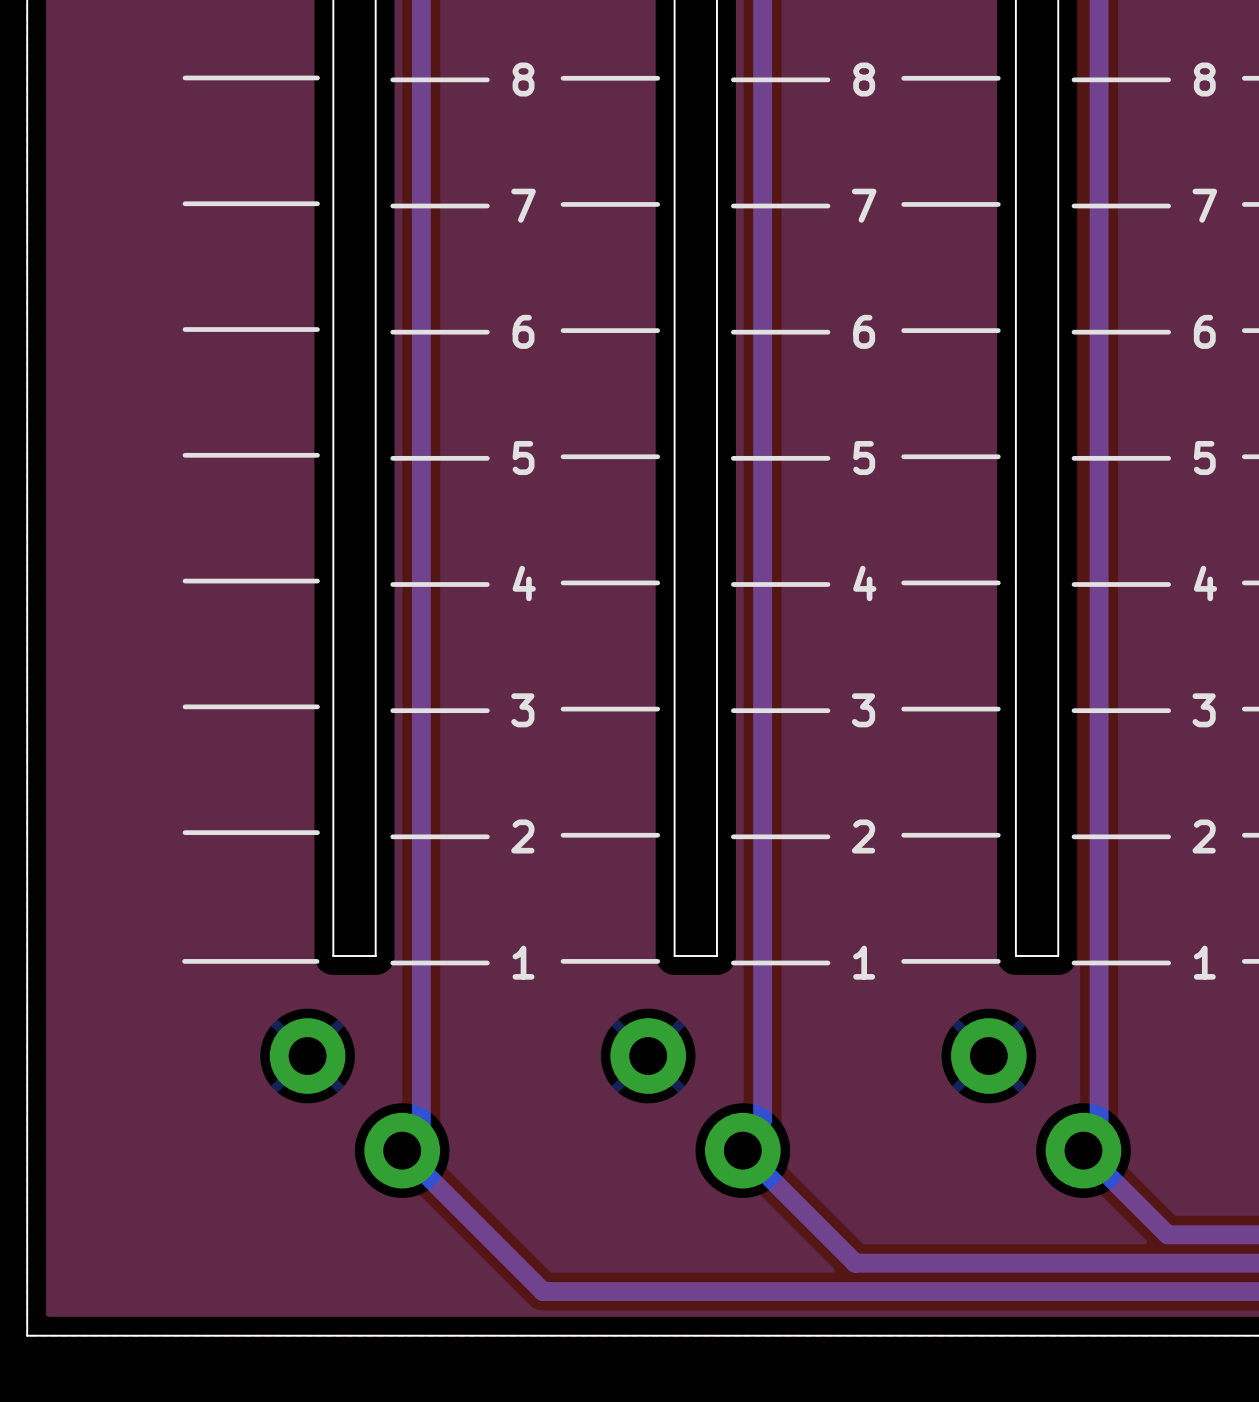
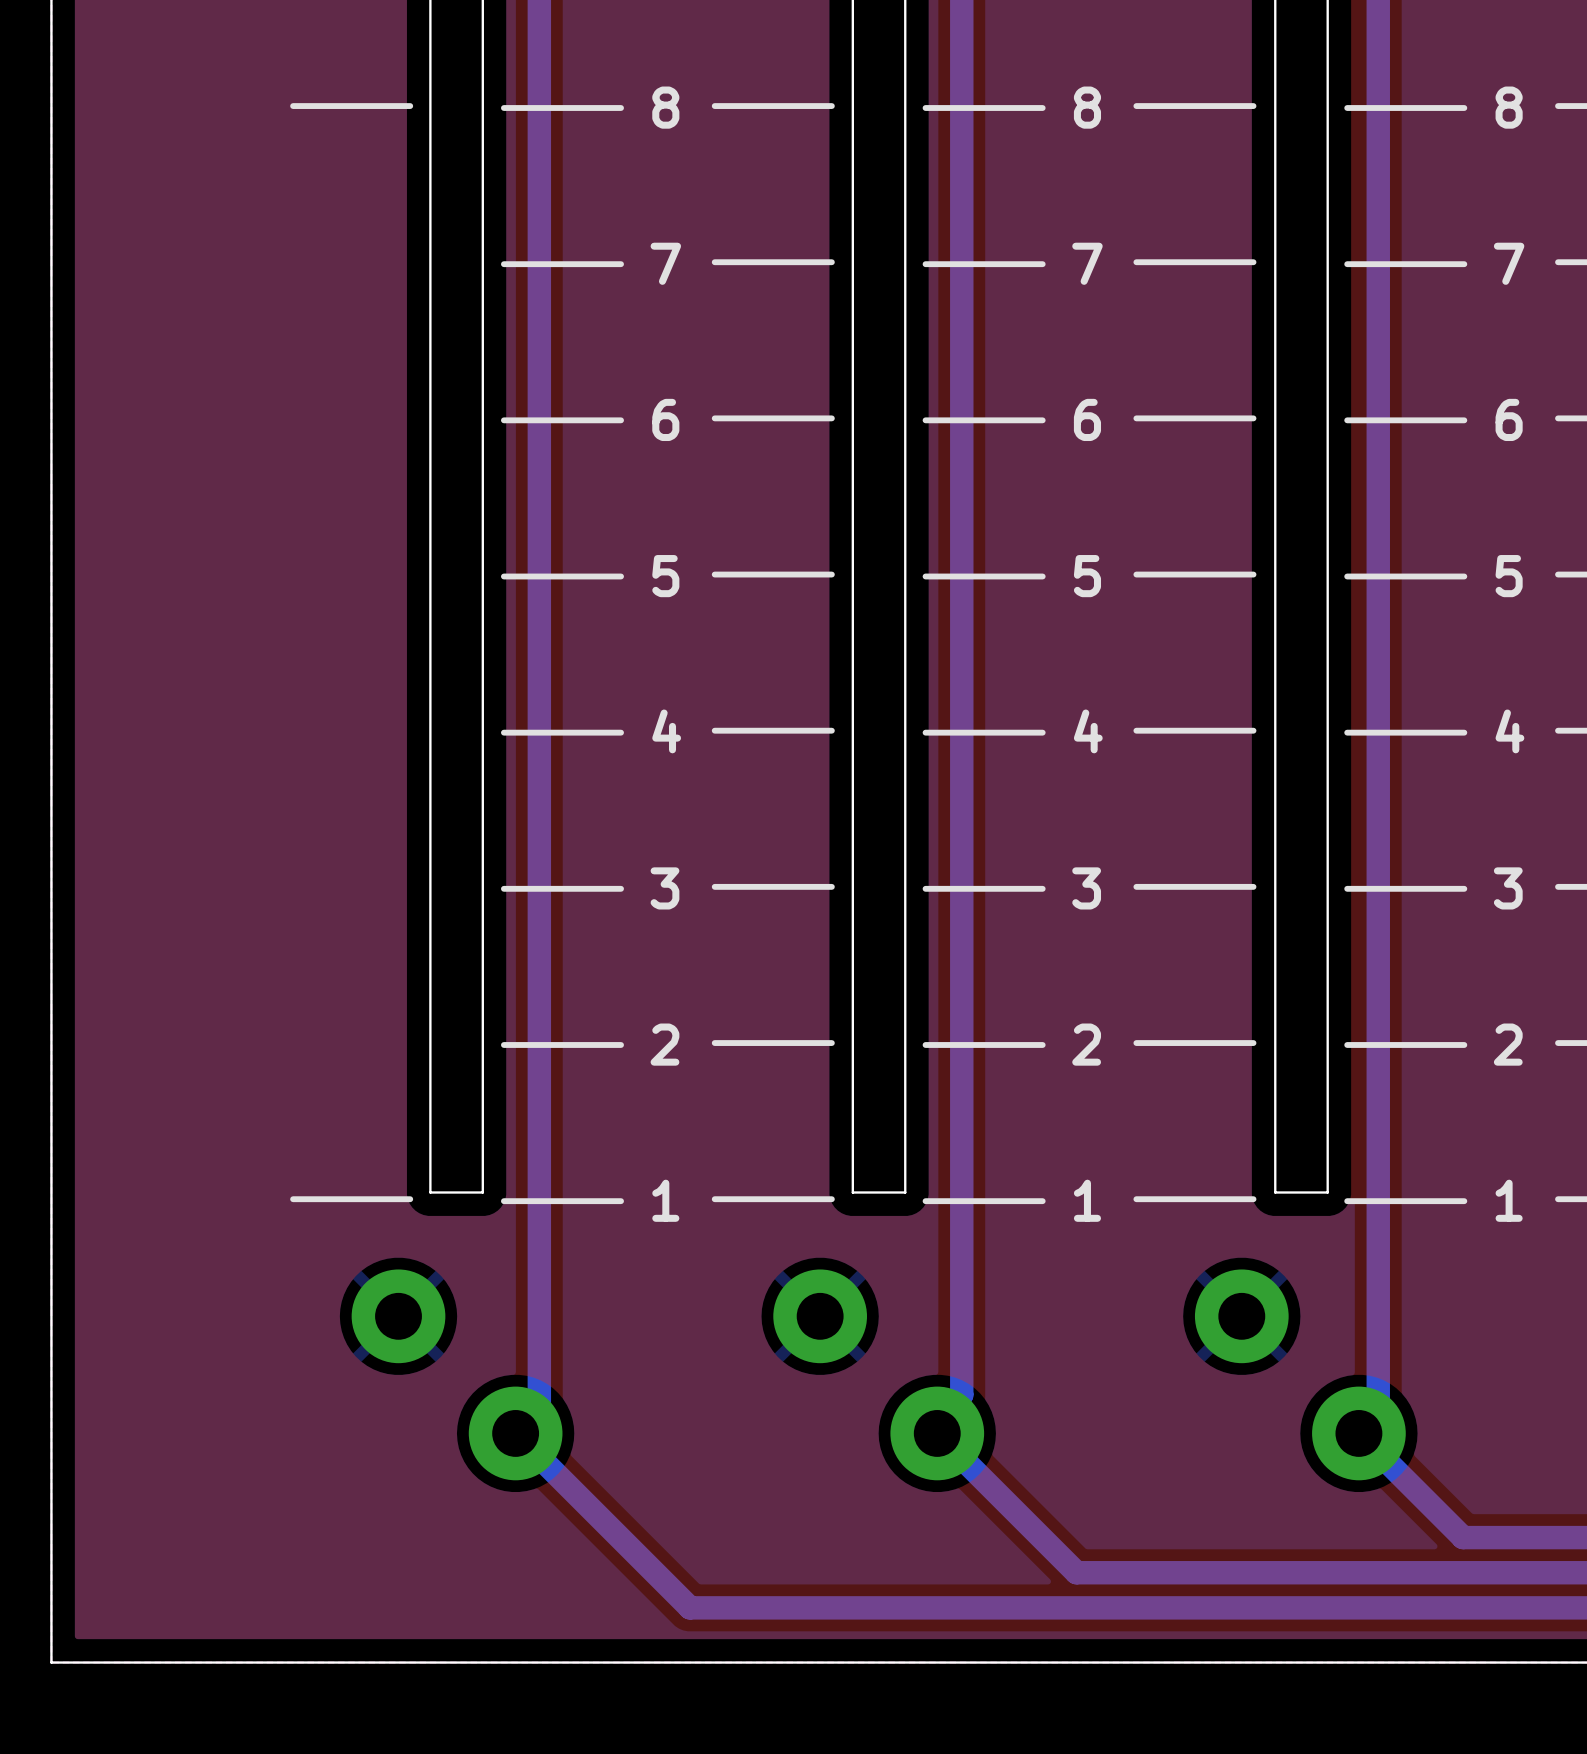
line: (185, 77) (317, 77) -> (293, 106) (410, 106)
line: (185, 203) (317, 203) -> none
line: (185, 329) (317, 329) -> none
line: (185, 455) (317, 455) -> none
line: (185, 581) (317, 581) -> none
line: (185, 706) (317, 706) -> none
line: (185, 832) (317, 832) -> none
line: (184, 961) (222, 961) -> none

